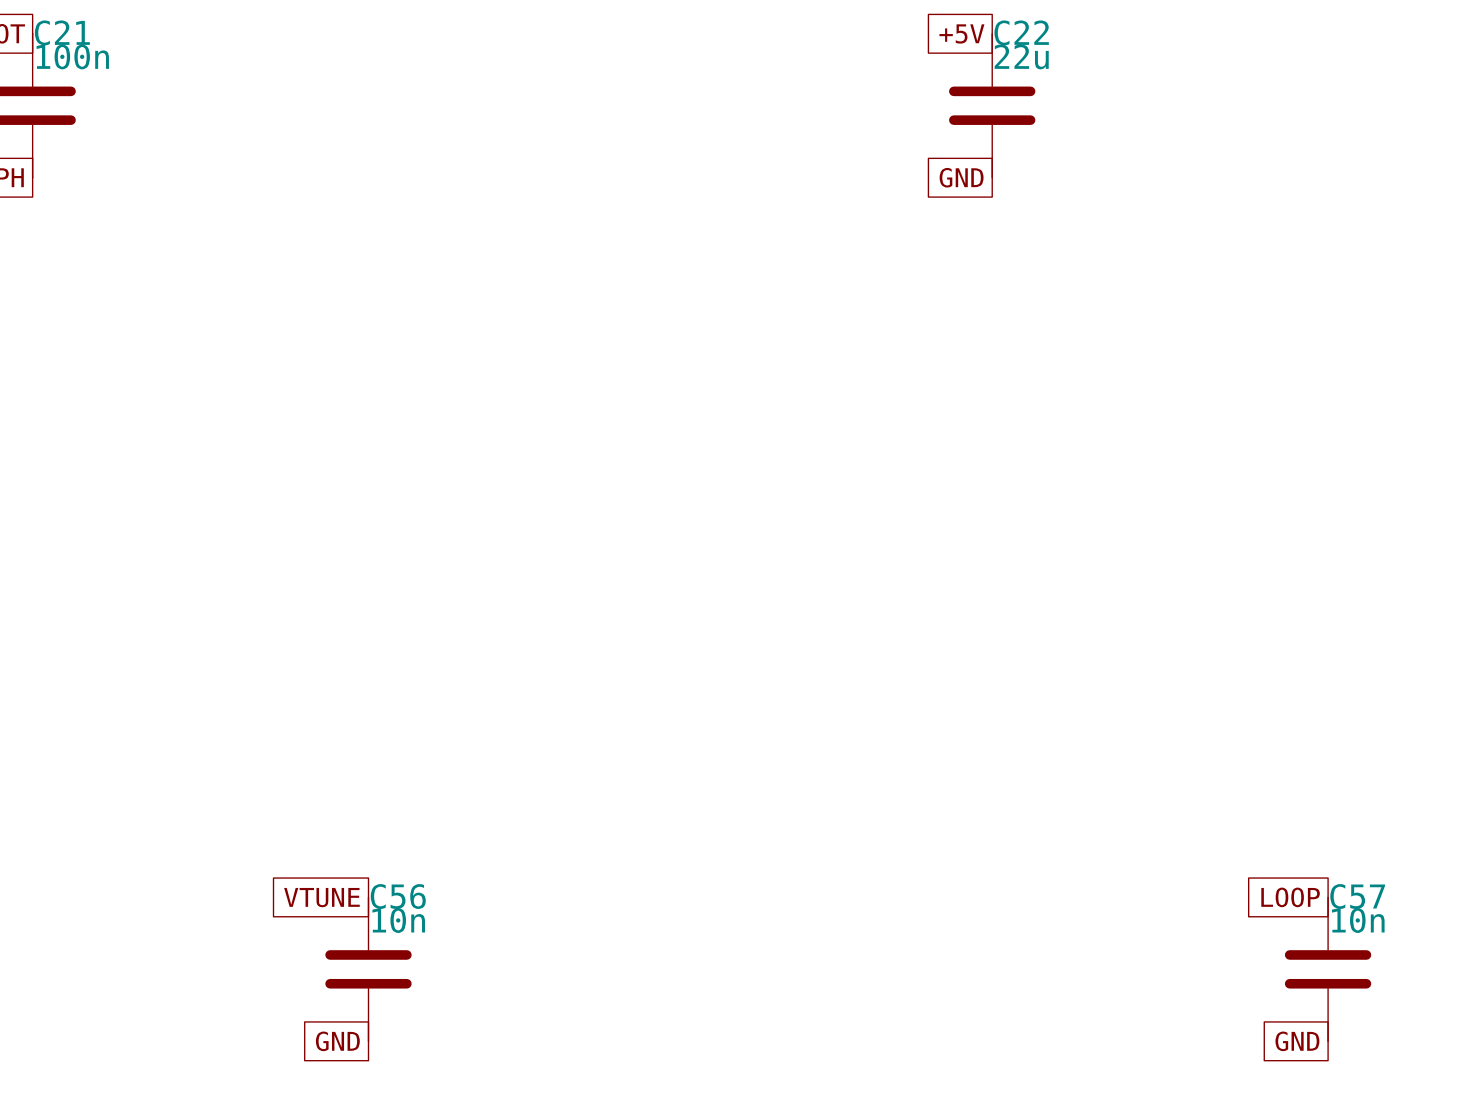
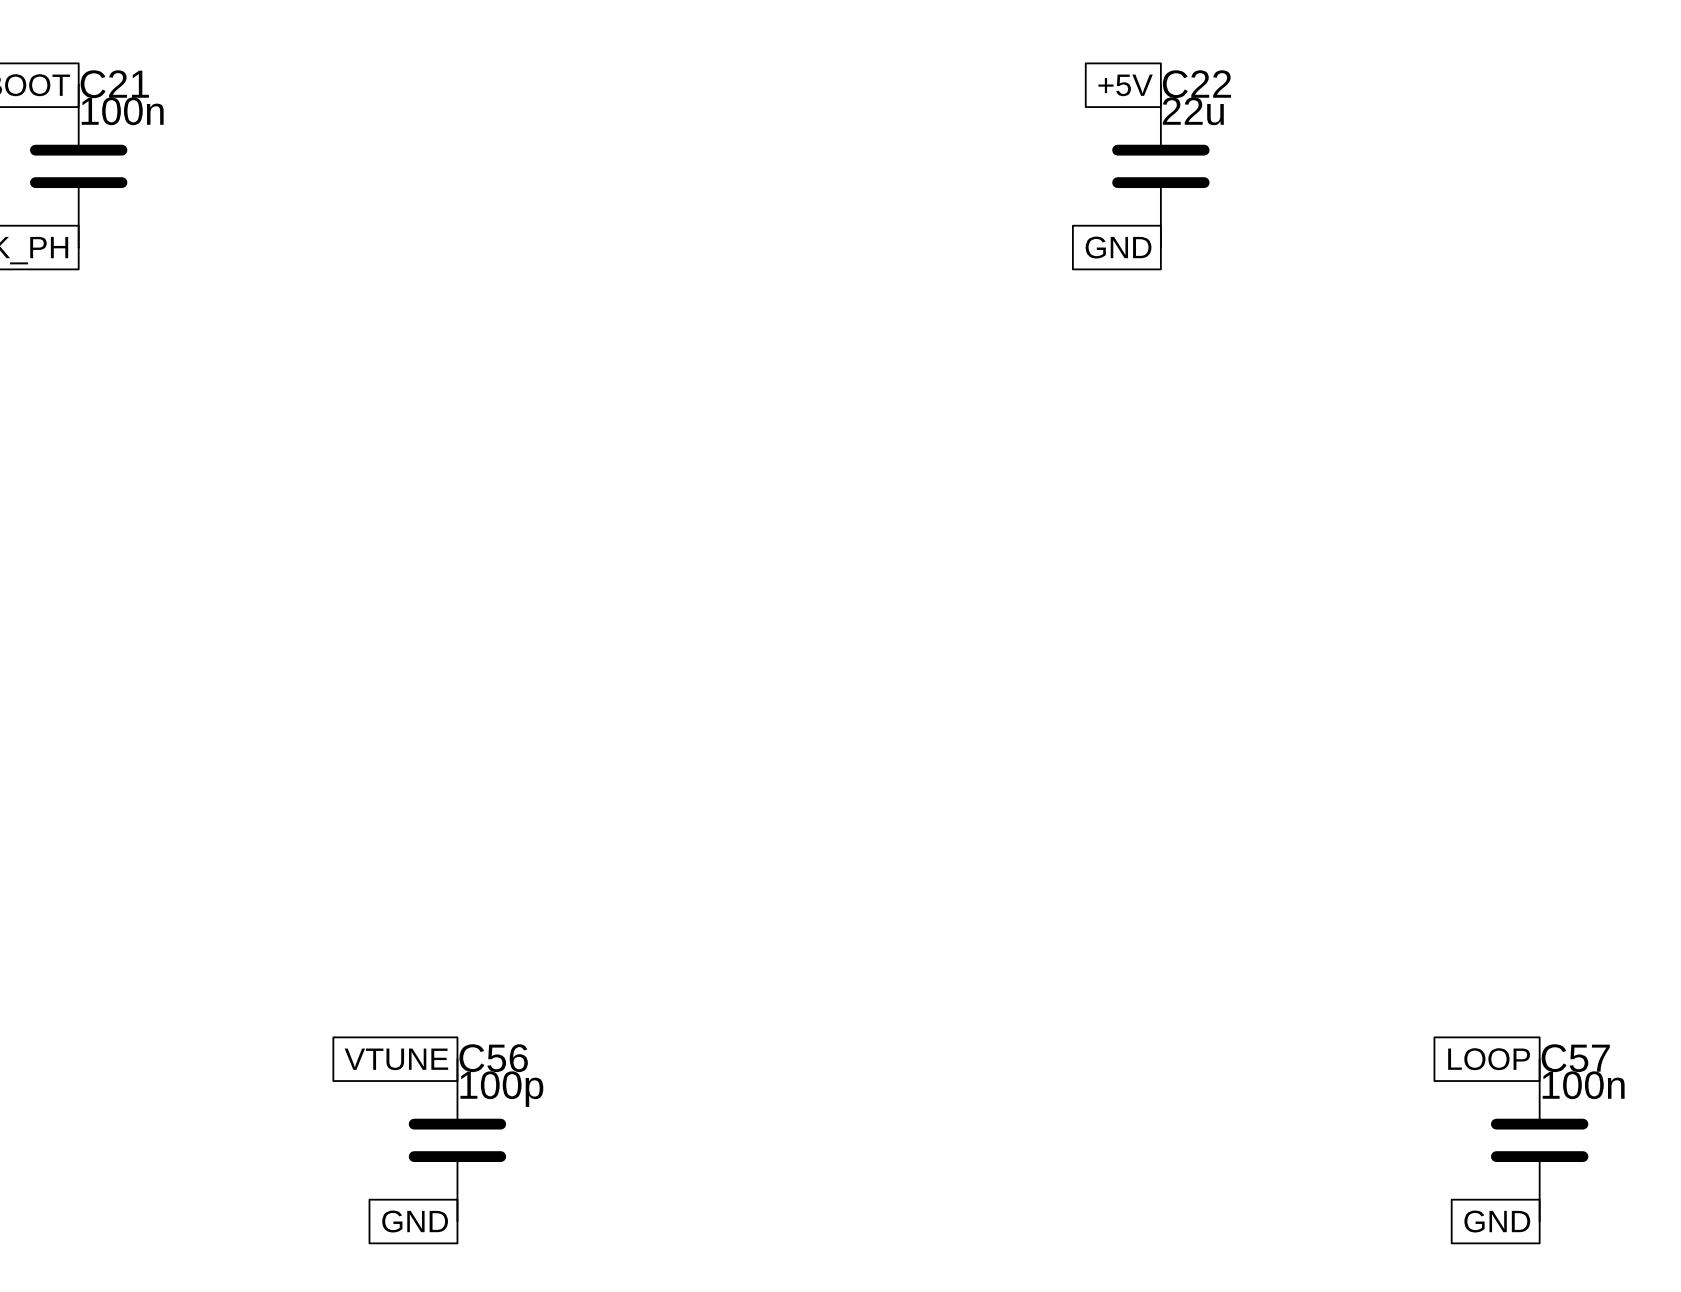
C56 value: 10n (398, 920) -> 100p (501, 1089)
C57 value: 10n (1358, 920) -> 100n (1583, 1085)

